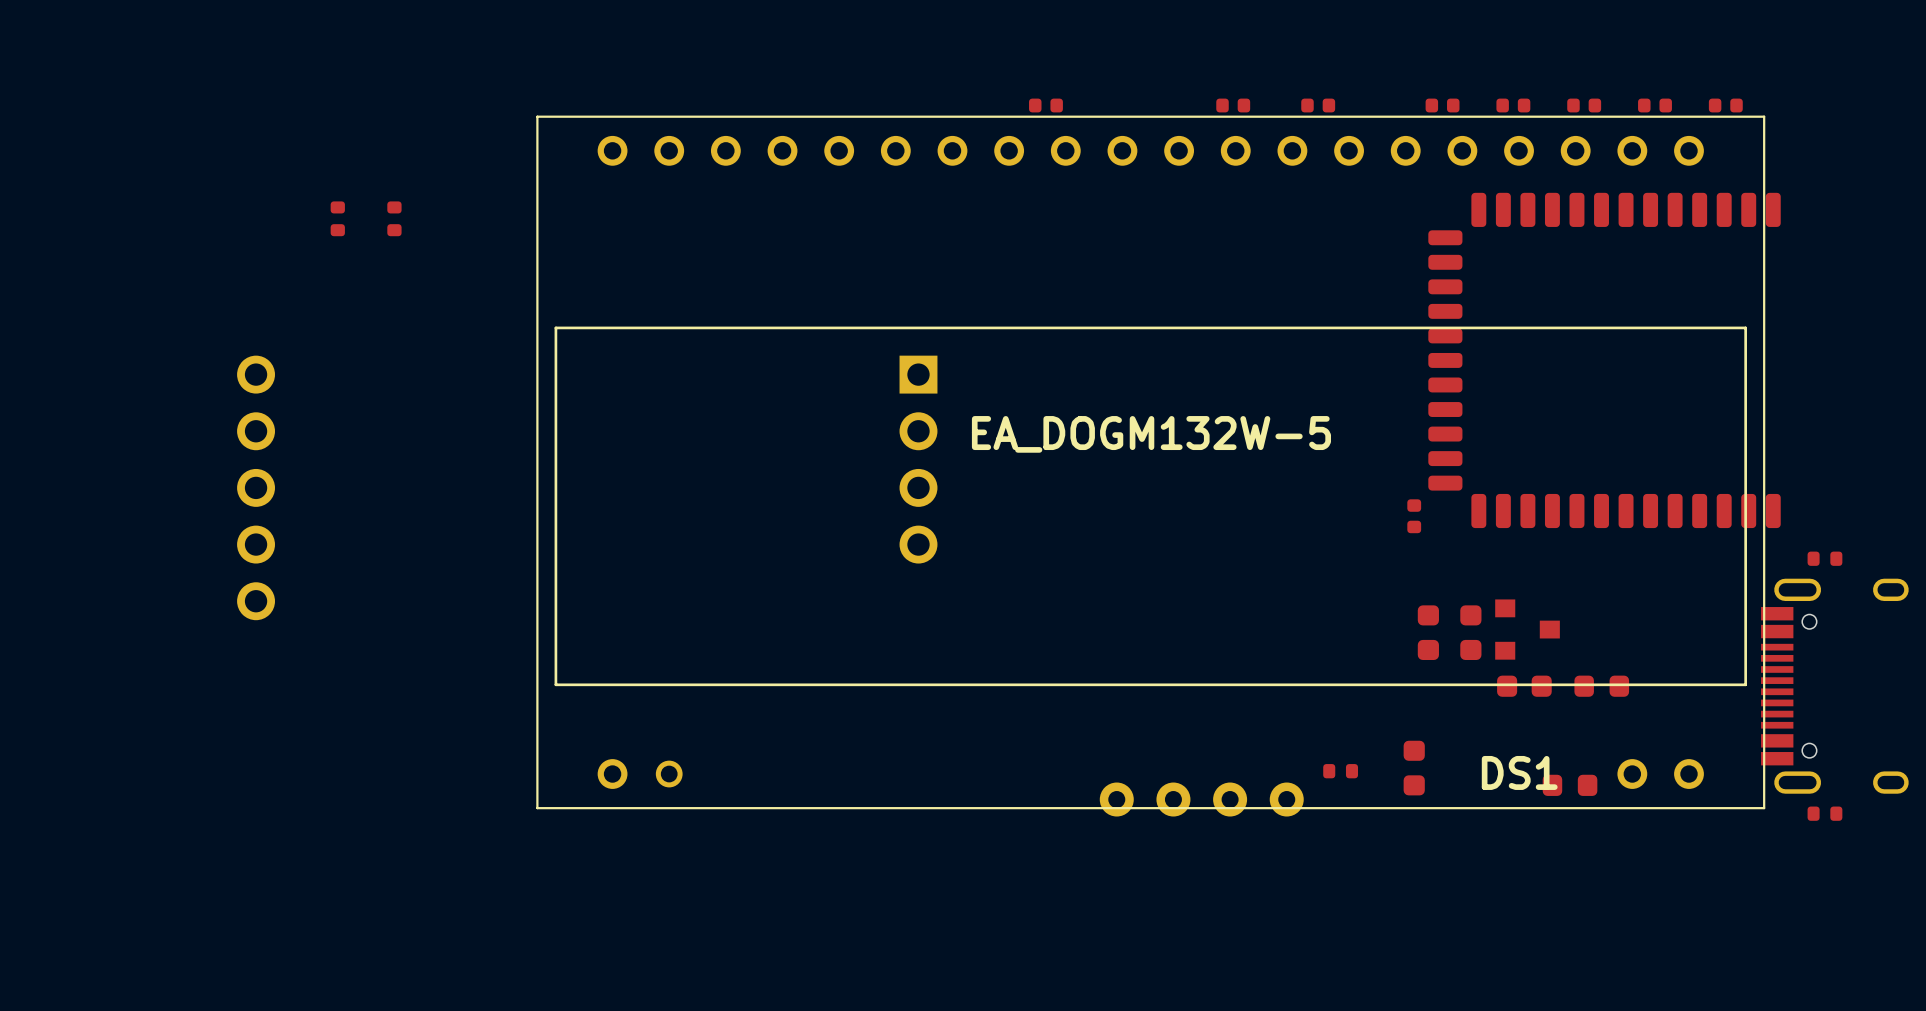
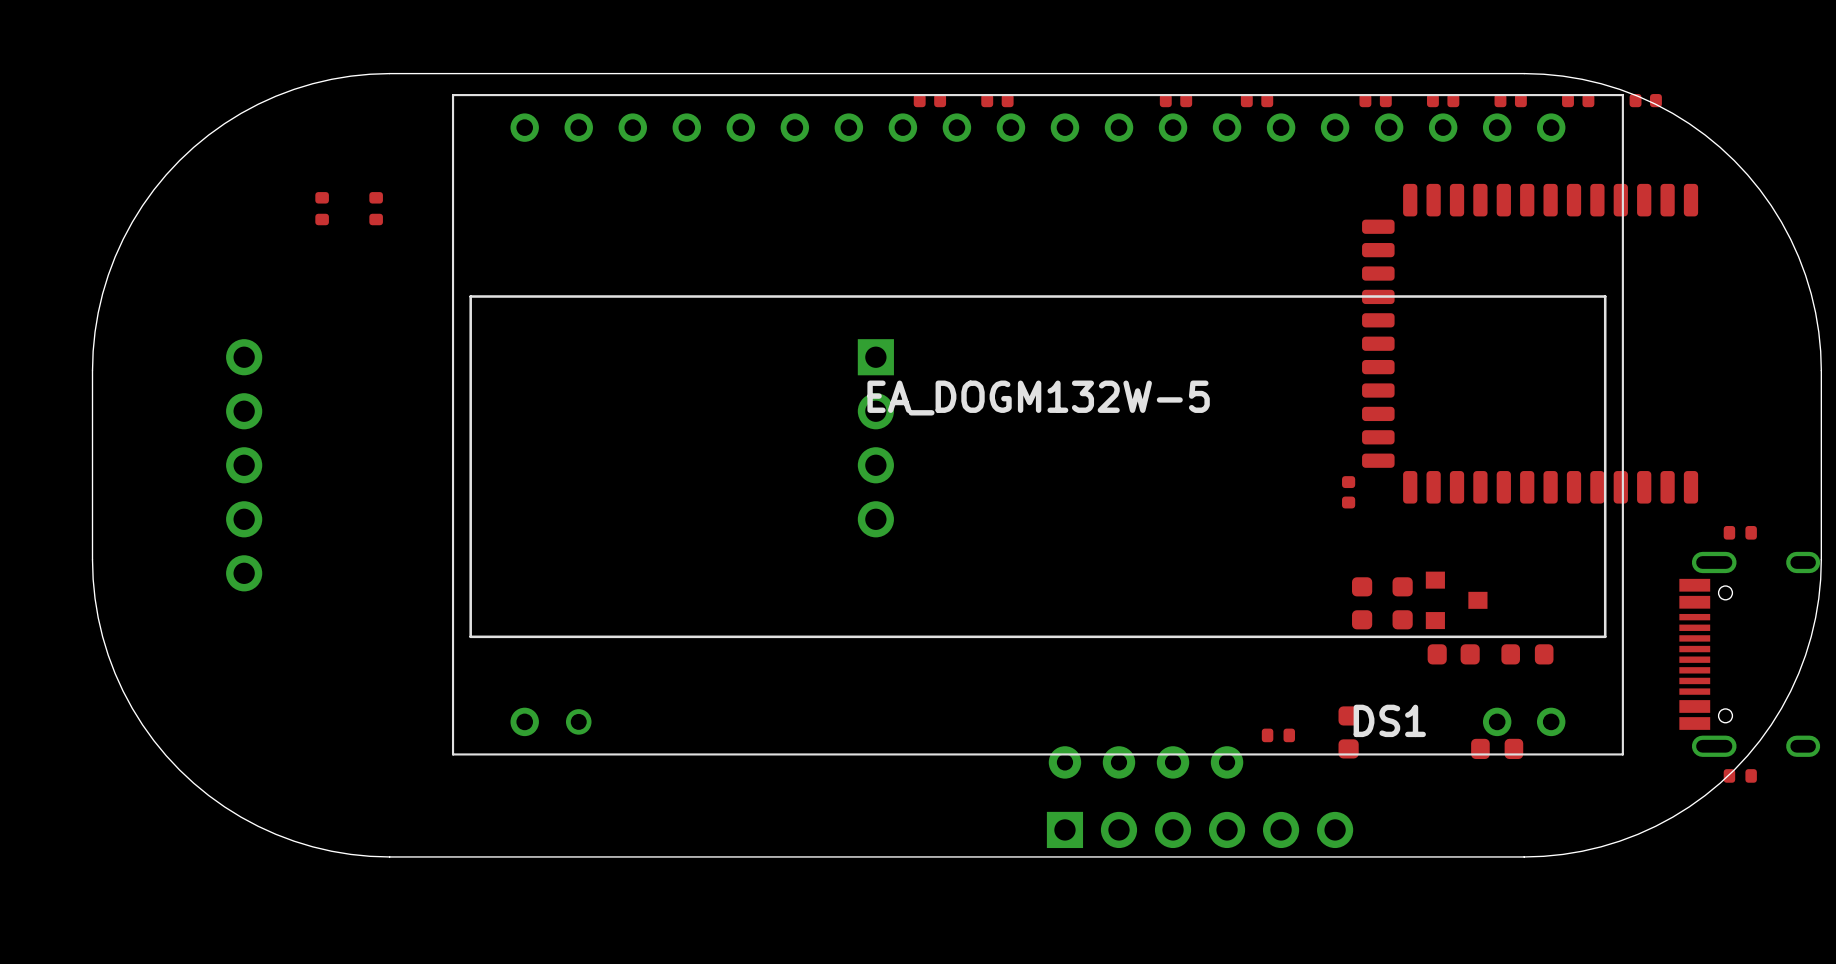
board edge: none -> (1524, 73) (389, 73) (331, 79) (275, 96) (224, 123) (193, 147) (166, 174) (142, 205) (123, 239) (102, 293) (93, 351) (93, 579) (98, 617) (115, 673) (132, 708) (153, 740) (179, 769) (208, 795) (241, 817) (275, 834) (312, 846) (350, 854) (389, 856) (1524, 856) (1582, 851) (1637, 834) (1689, 806) (1734, 769) (1759, 740) (1781, 708) (1805, 655) (1815, 617) (1820, 579) (1821, 370) (1818, 331) (1805, 275) (1790, 239) (1759, 189) (1720, 147) (1672, 113) (1637, 96) (1582, 79) (1524, 73)
part: none -> (929, 100)
DS1 position: (1150, 462) -> (1037, 424)
part: none -> (1200, 829)

